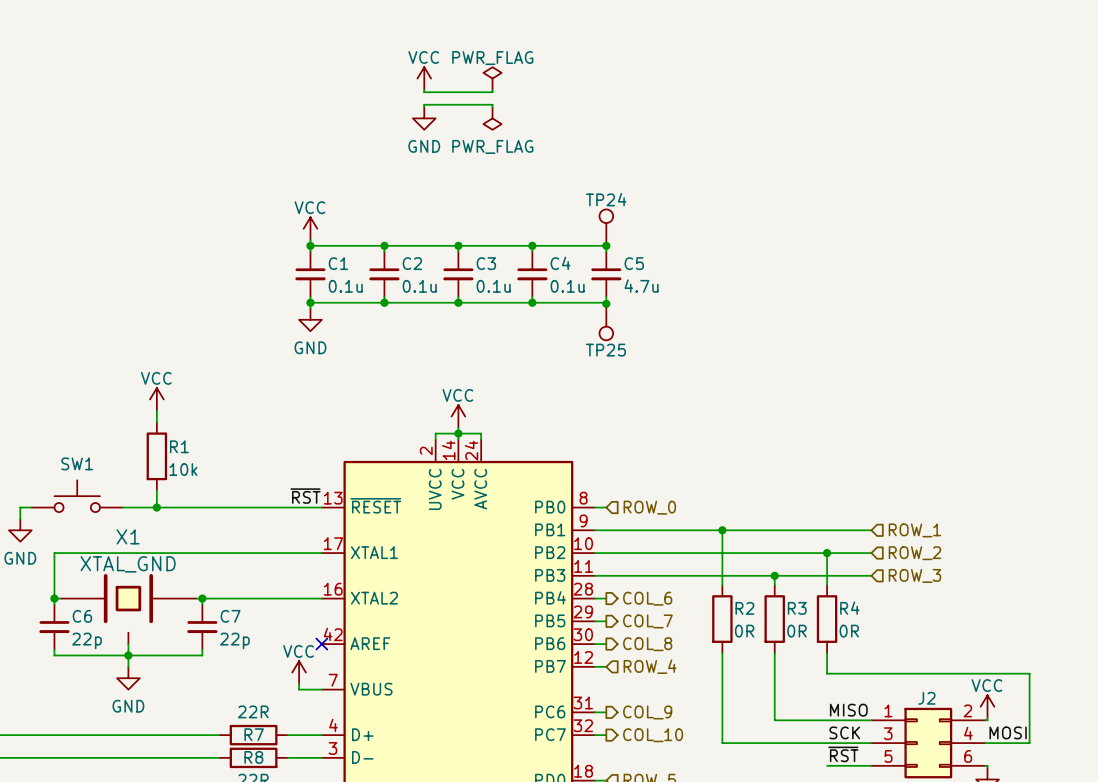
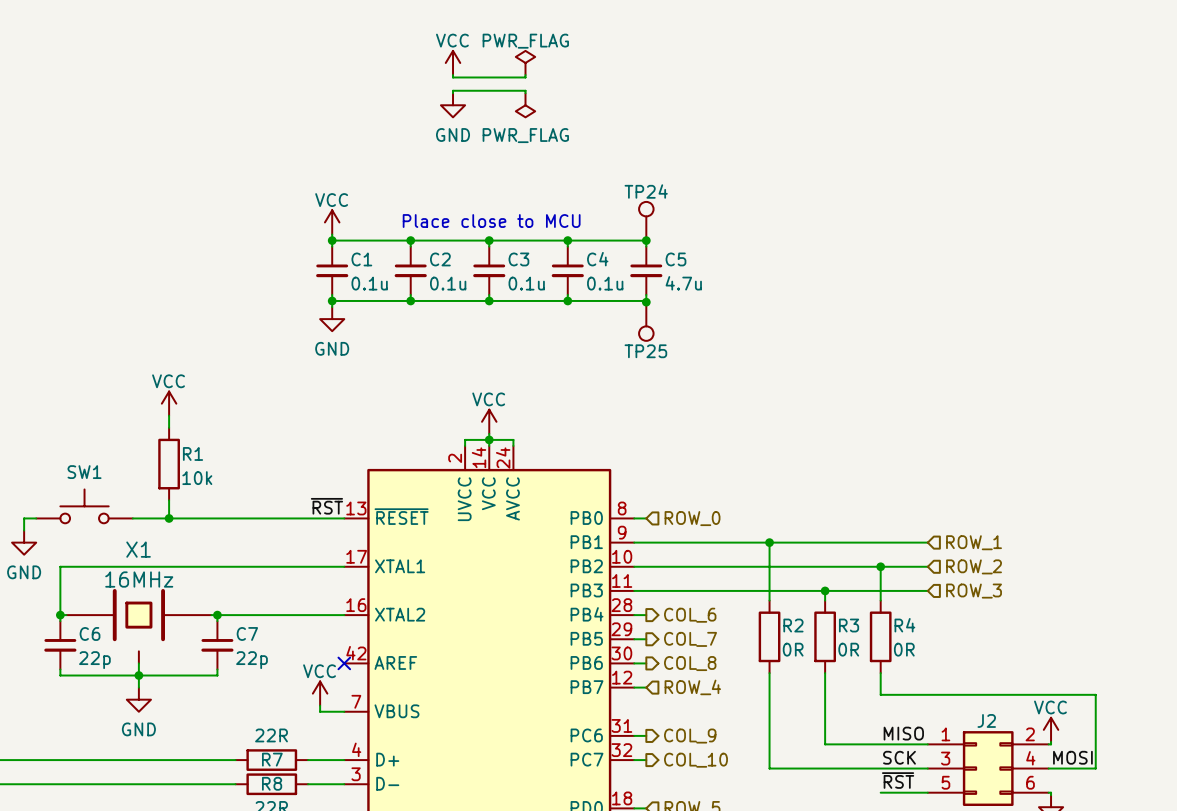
text: none -> Place close to MCU (491, 221)
X1 value: XTAL_GND (128, 564) -> 16MHz (139, 579)

